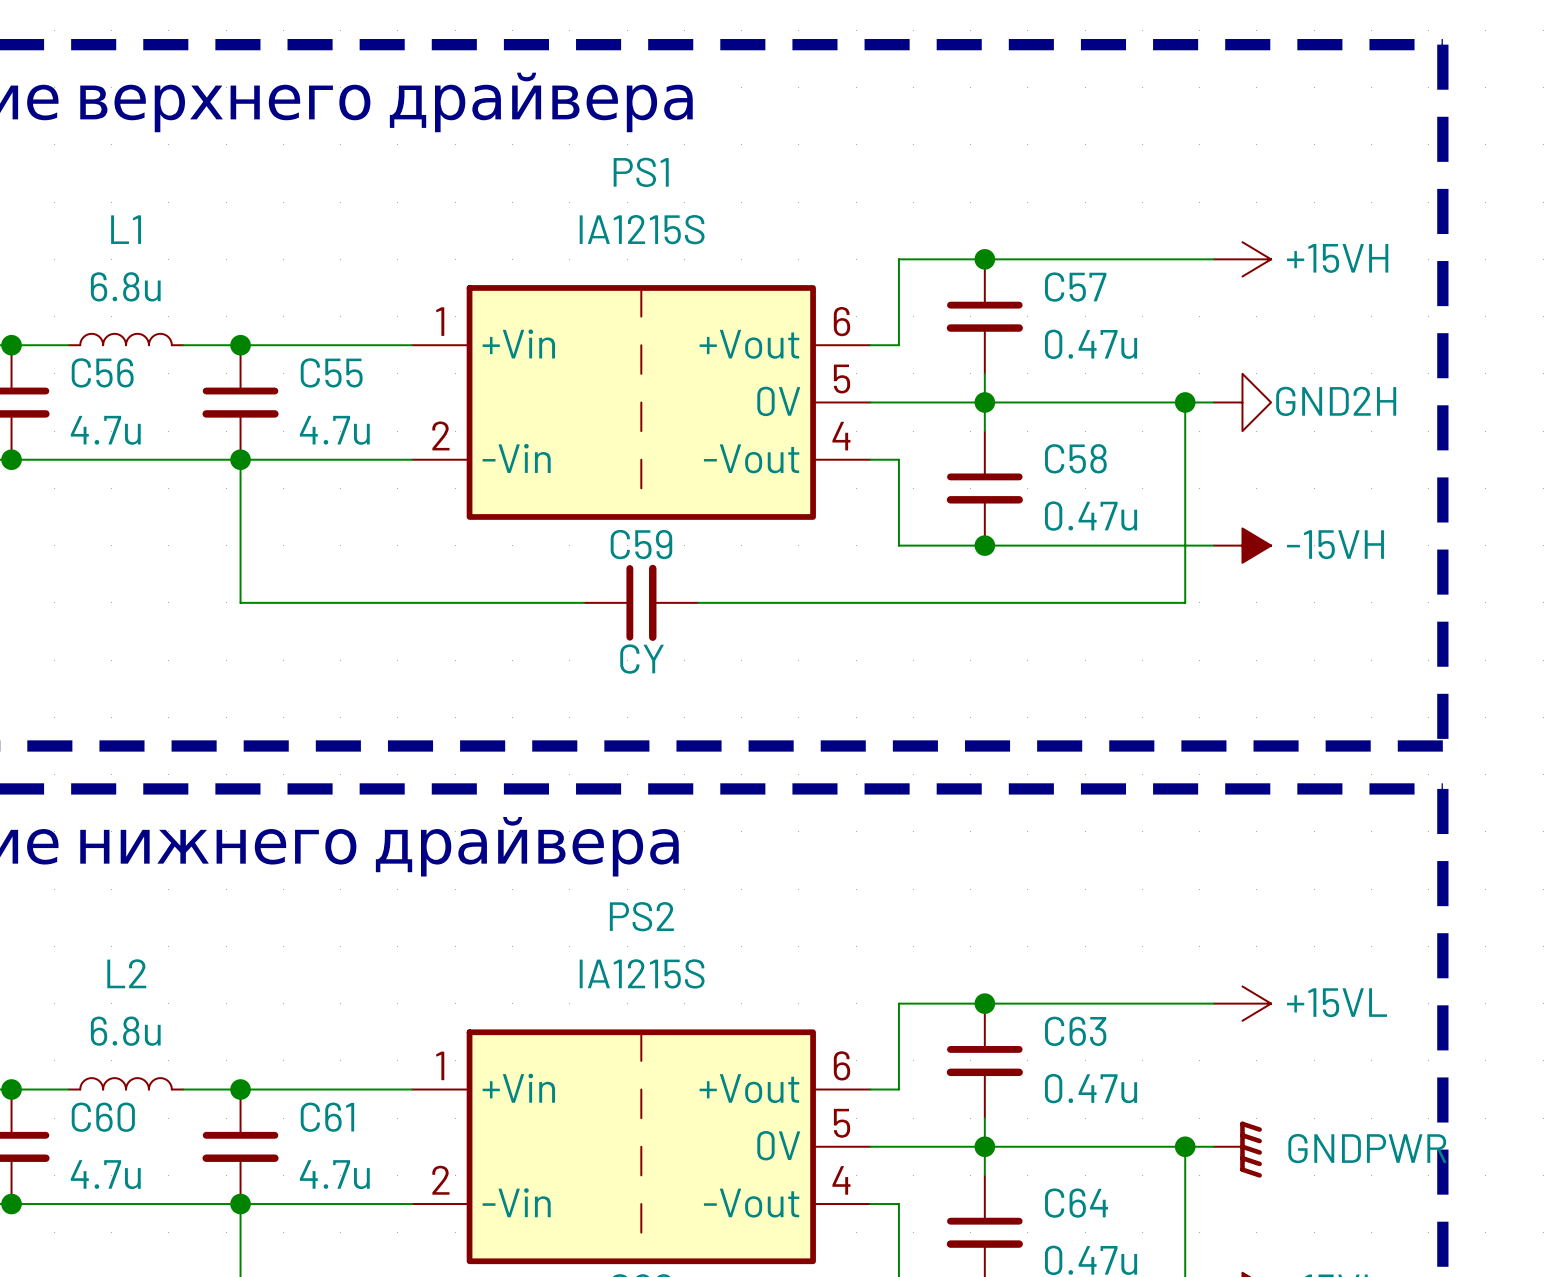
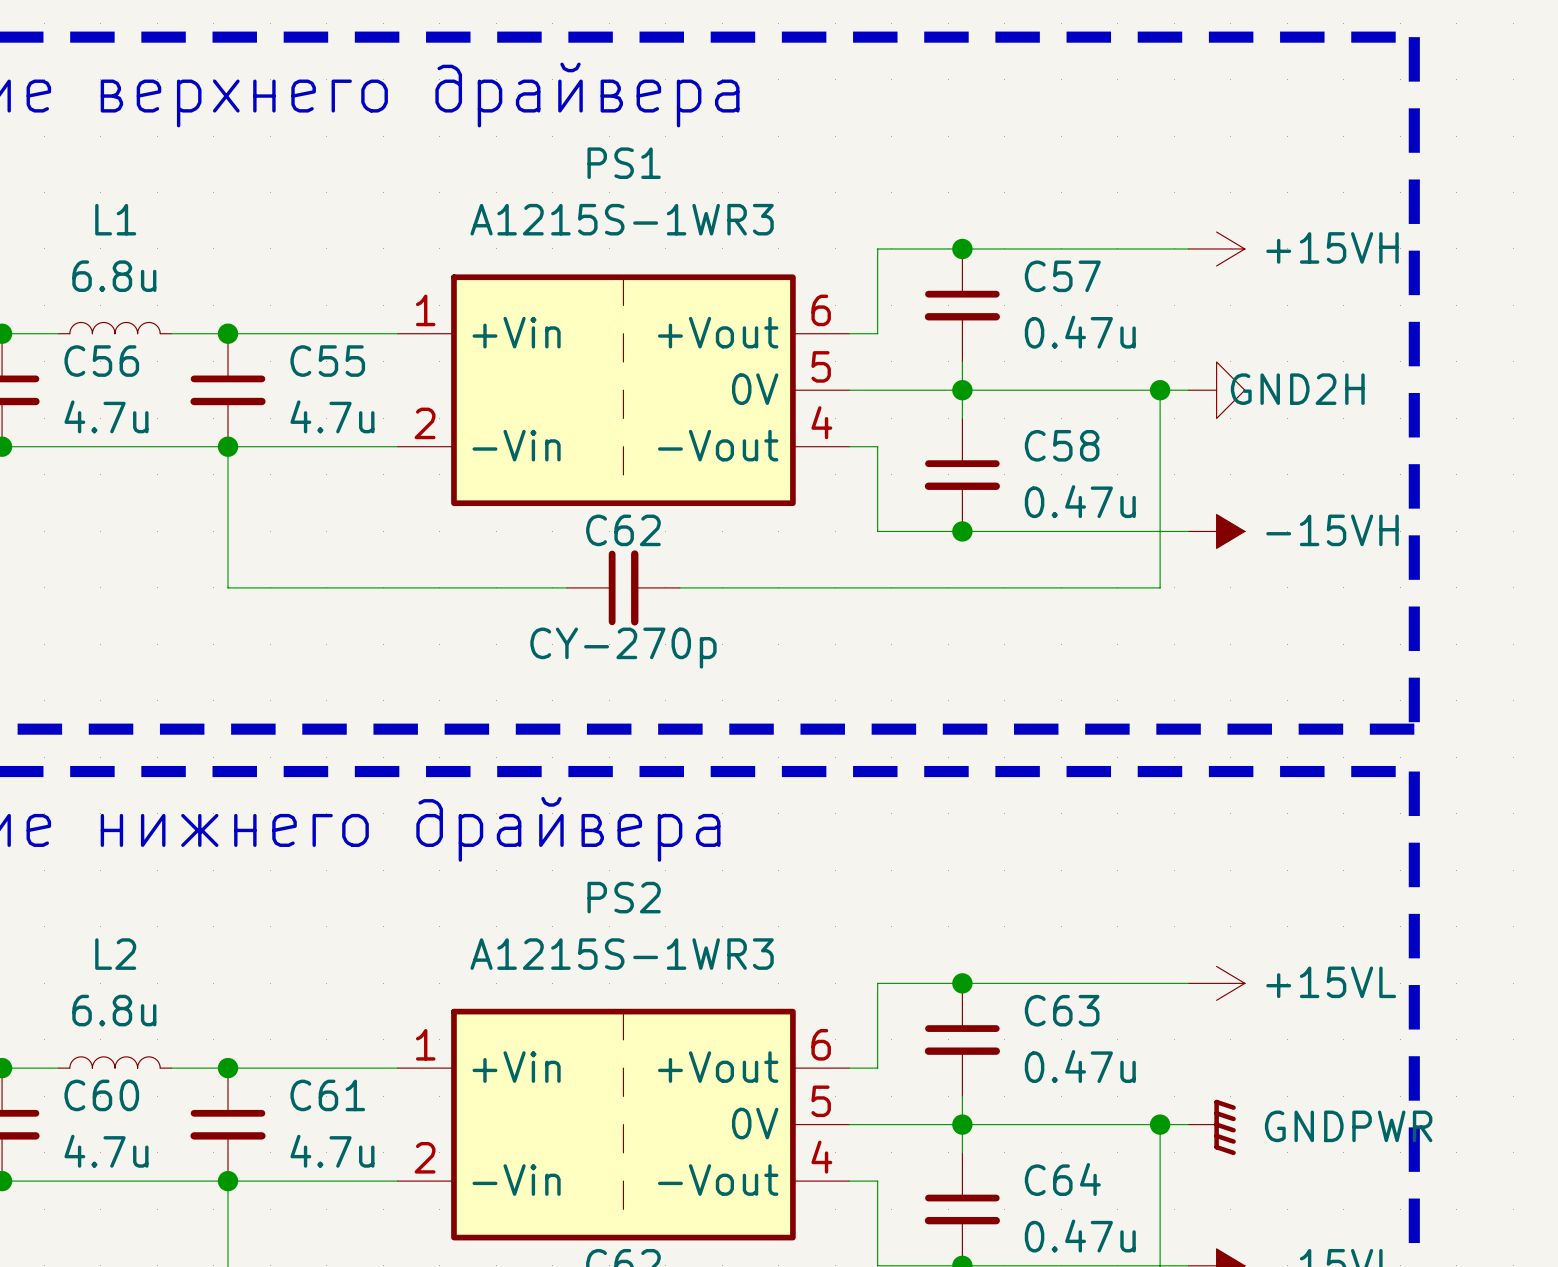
PS1 value: IA1215S (642, 229) -> A1215S-1WR3 (622, 219)
C59 name: C59 (641, 544) -> C62 (623, 530)
C59 value: CY (642, 659) -> CY-270p (623, 648)
PS2 value: IA1215S (642, 973) -> A1215S-1WR3 (622, 954)

